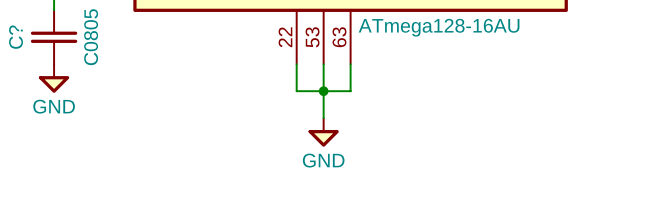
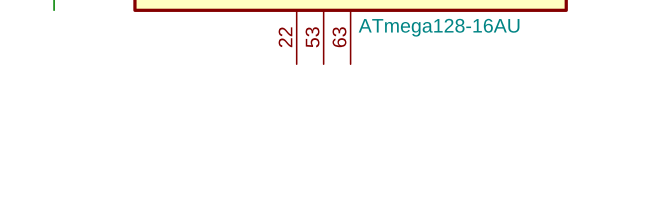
C?: C0805 (54, 37) -> none
wire: (296, 64) (296, 91) (350, 91) (350, 64) -> none
wire: (323, 64) (323, 118) -> none
power symbol: GND (54, 78) -> none
junction: (323, 91) -> none
power symbol: GND (323, 132) -> none

